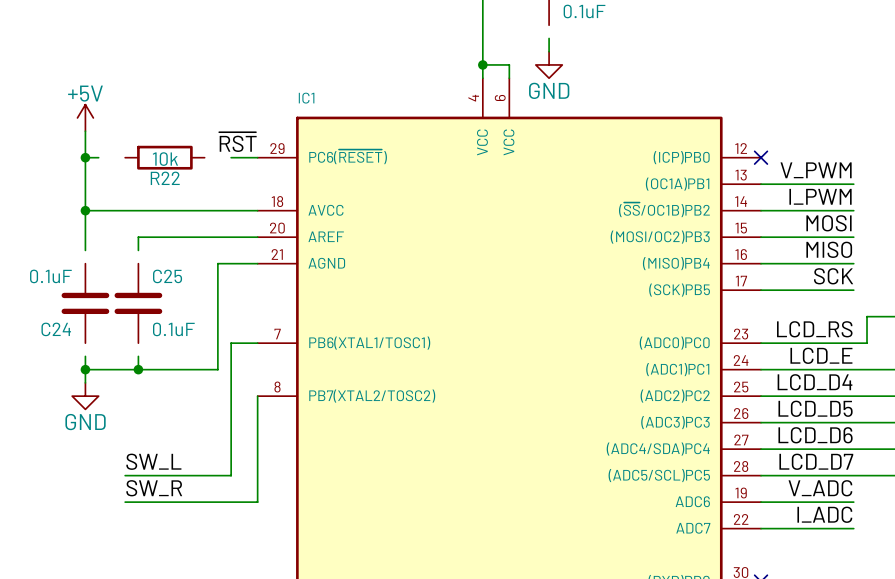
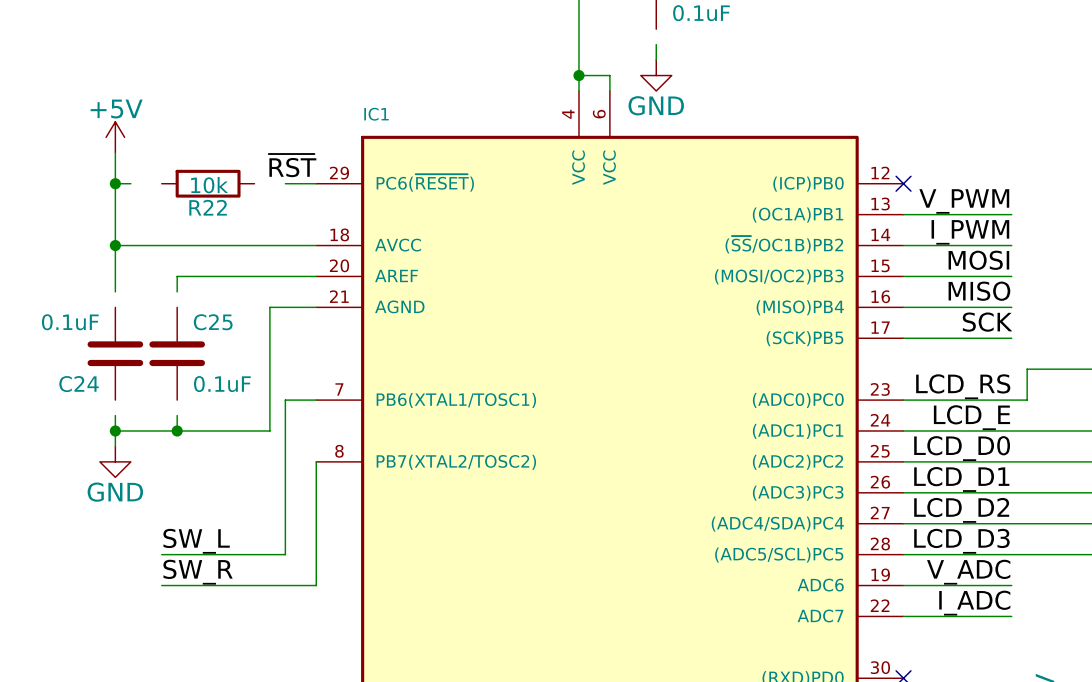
label: LCD_D4 (815, 382) -> LCD_D0 (962, 448)
label: LCD_D5 (815, 408) -> LCD_D1 (961, 479)
label: LCD_D6 (815, 435) -> LCD_D2 (961, 510)
label: LCD_D7 (816, 461) -> LCD_D3 (961, 541)

